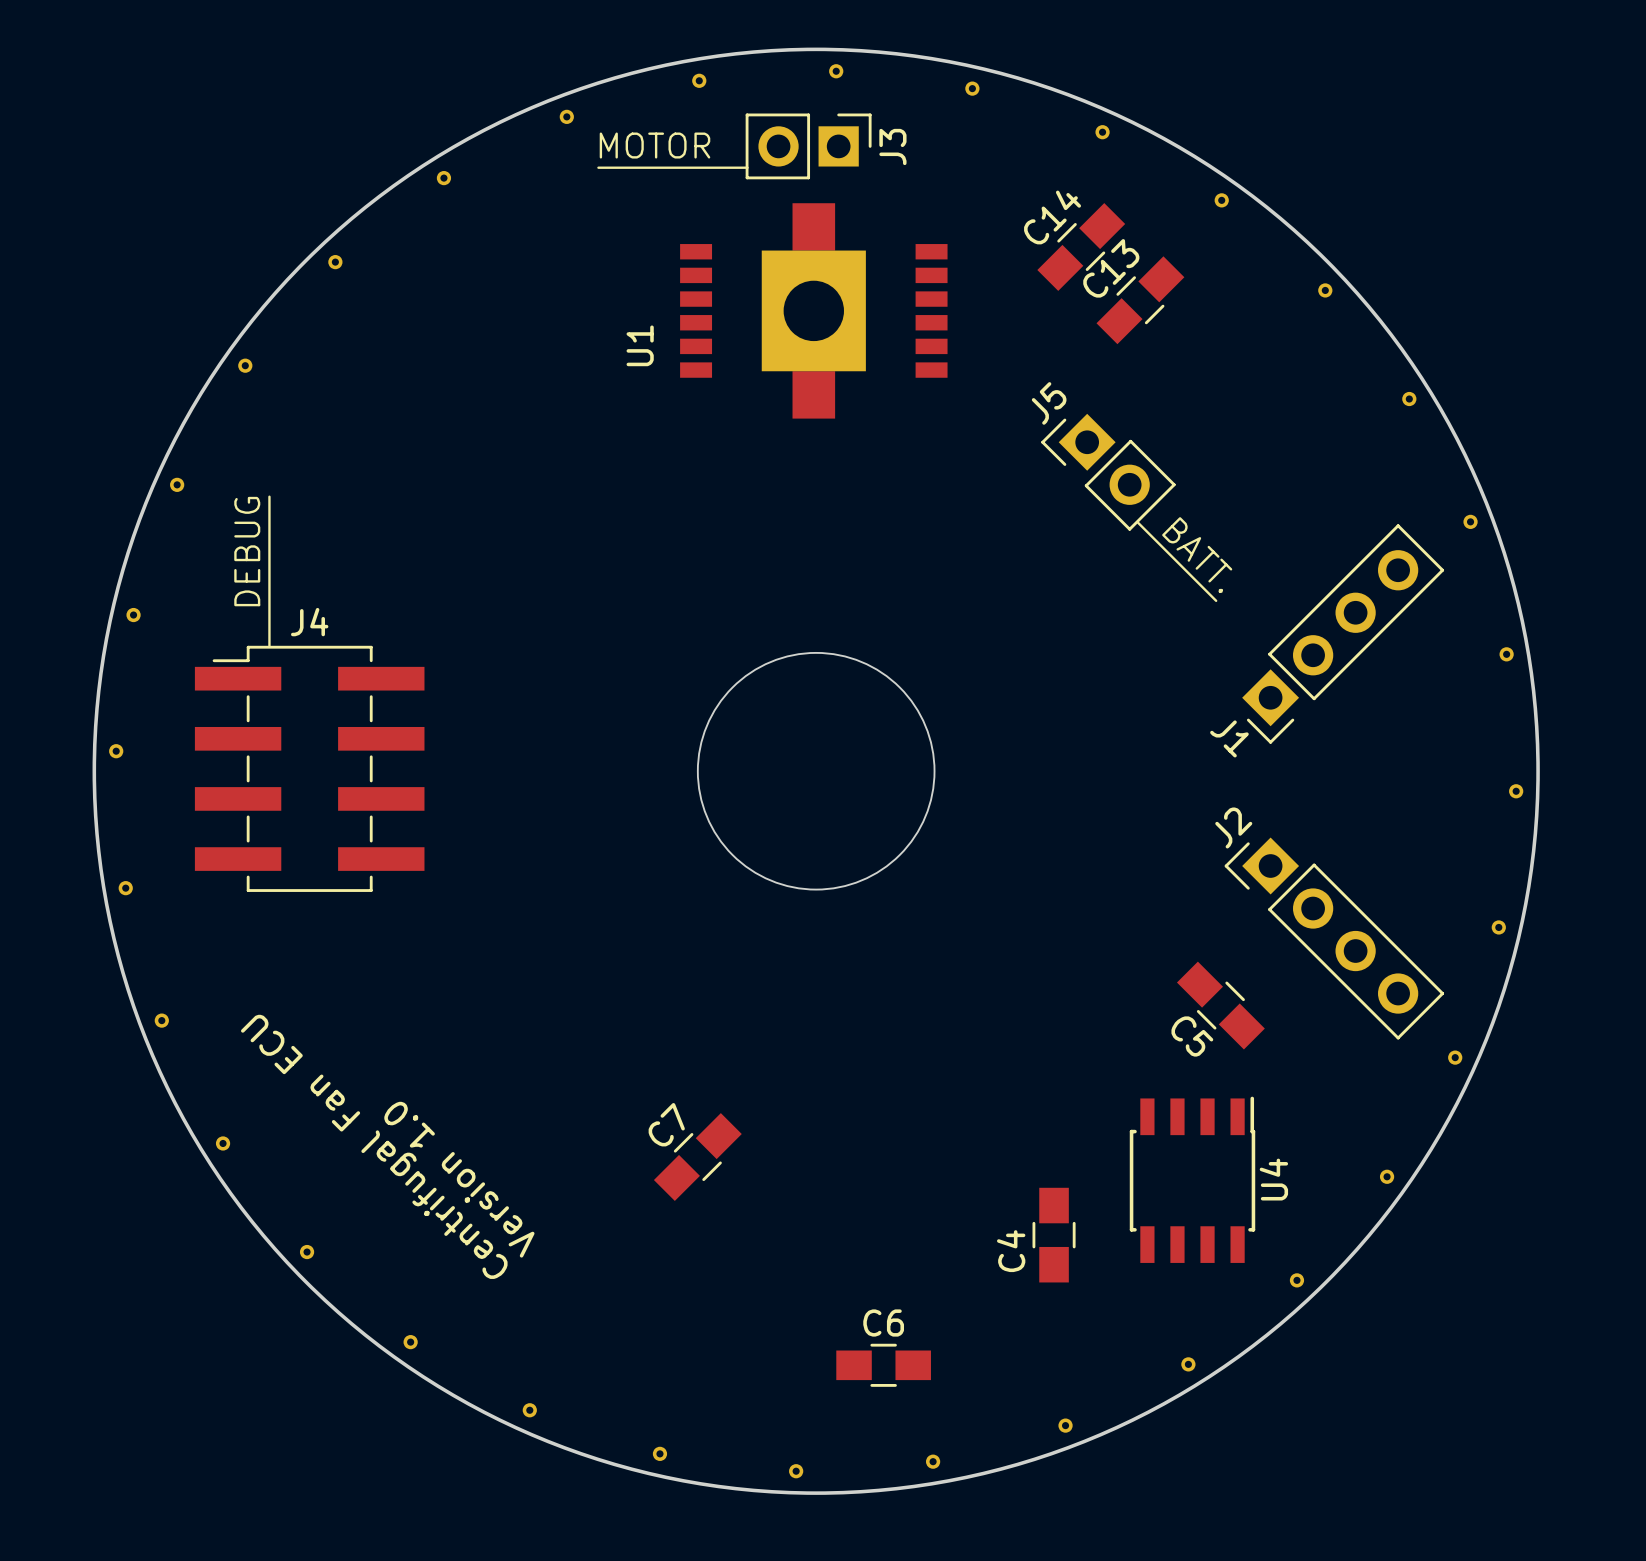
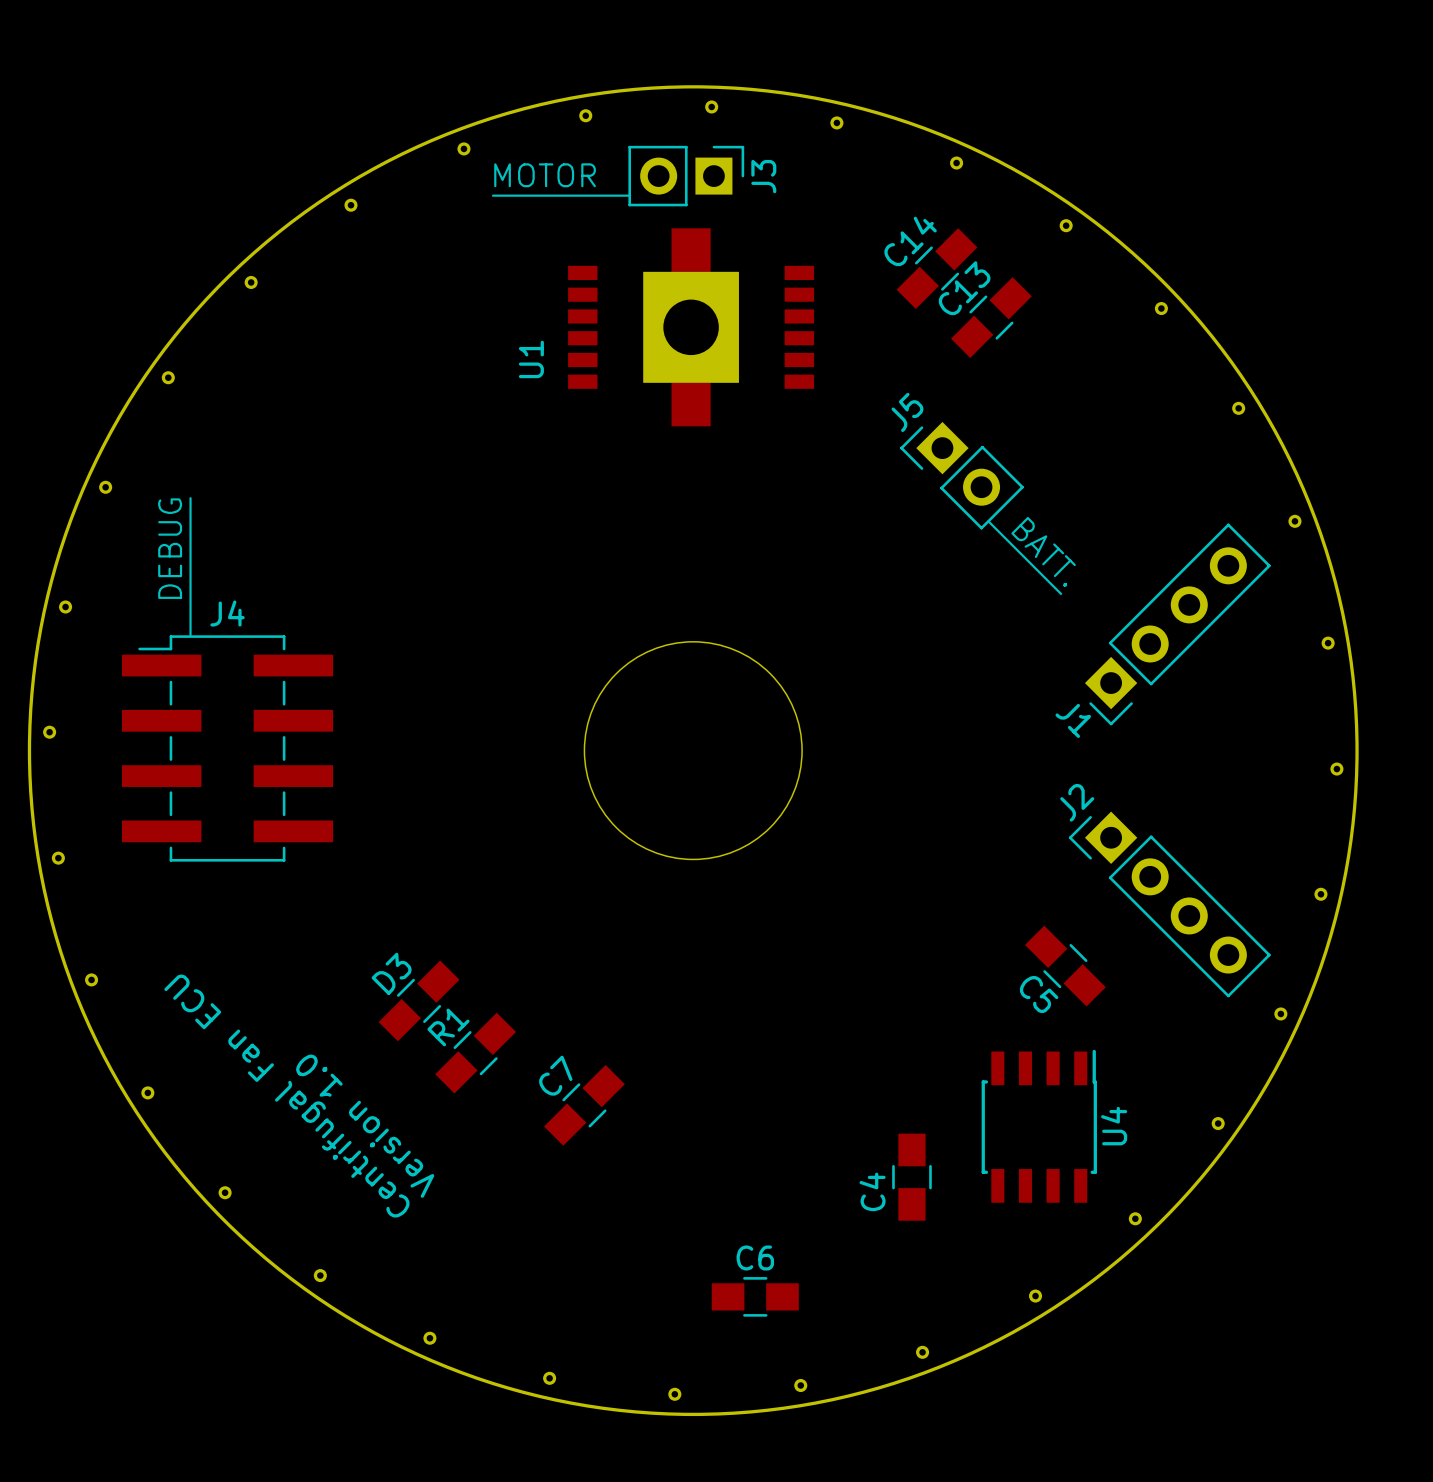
D3: none -> (419, 1000)
R1: none -> (475, 1053)

